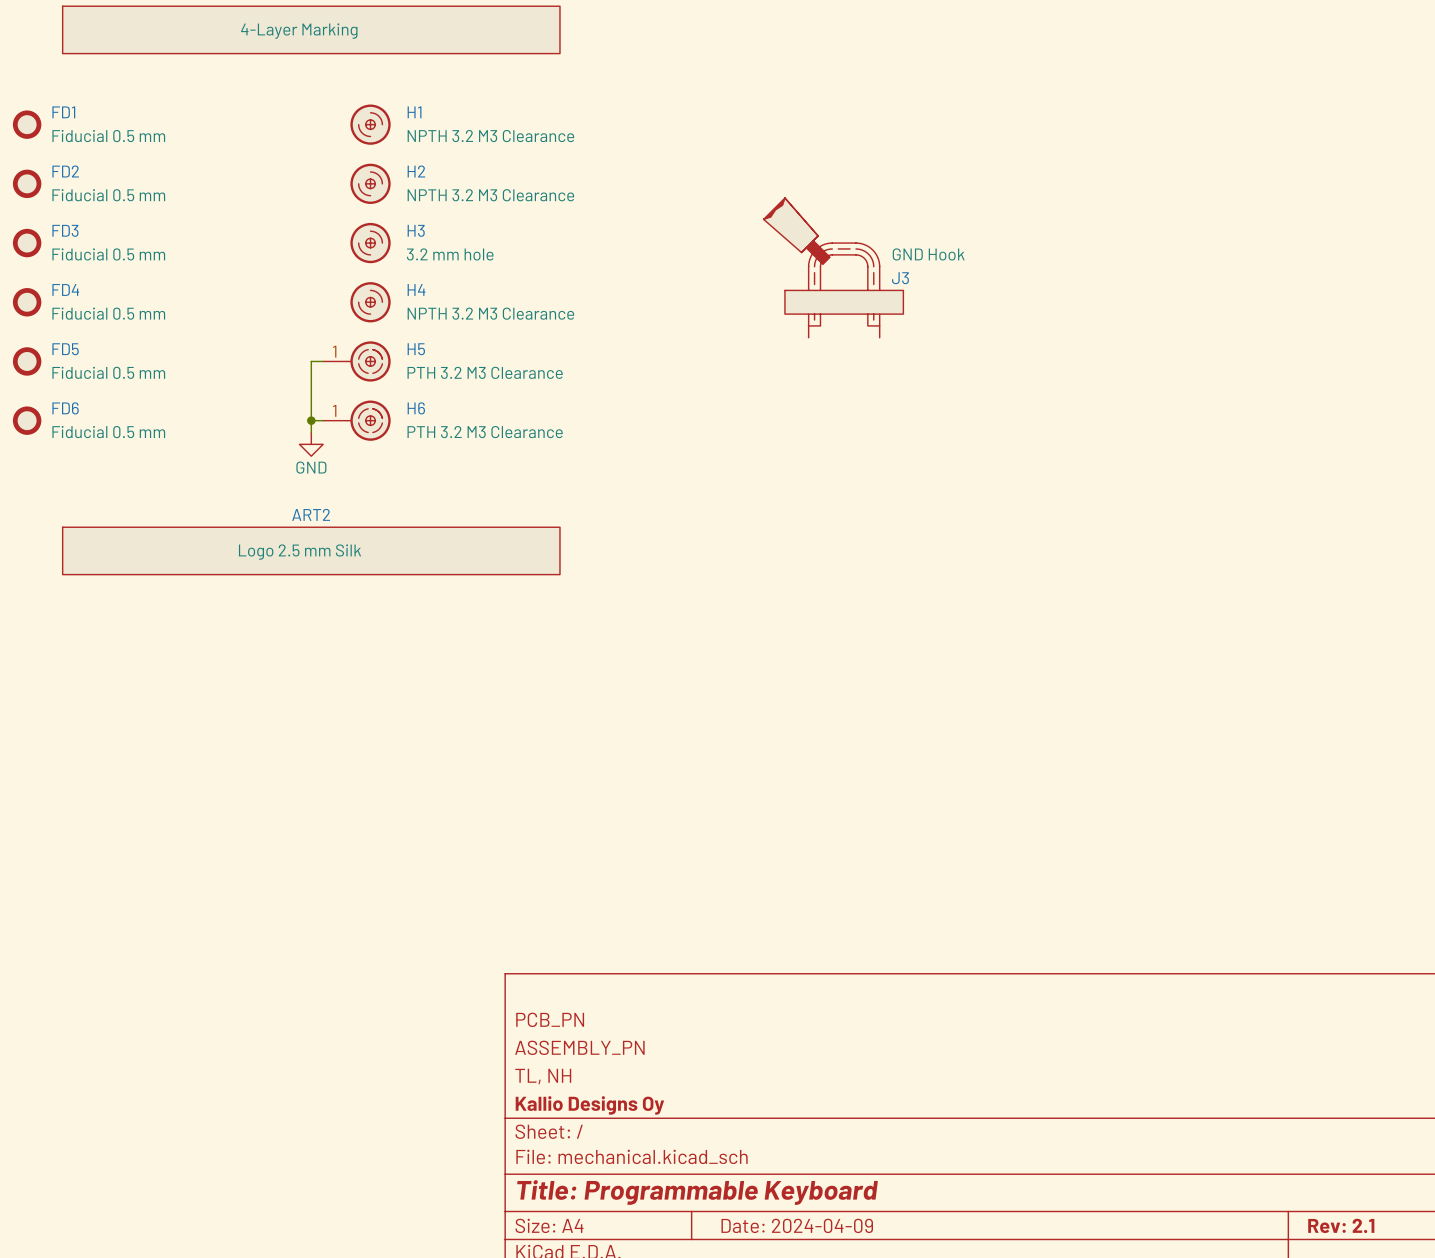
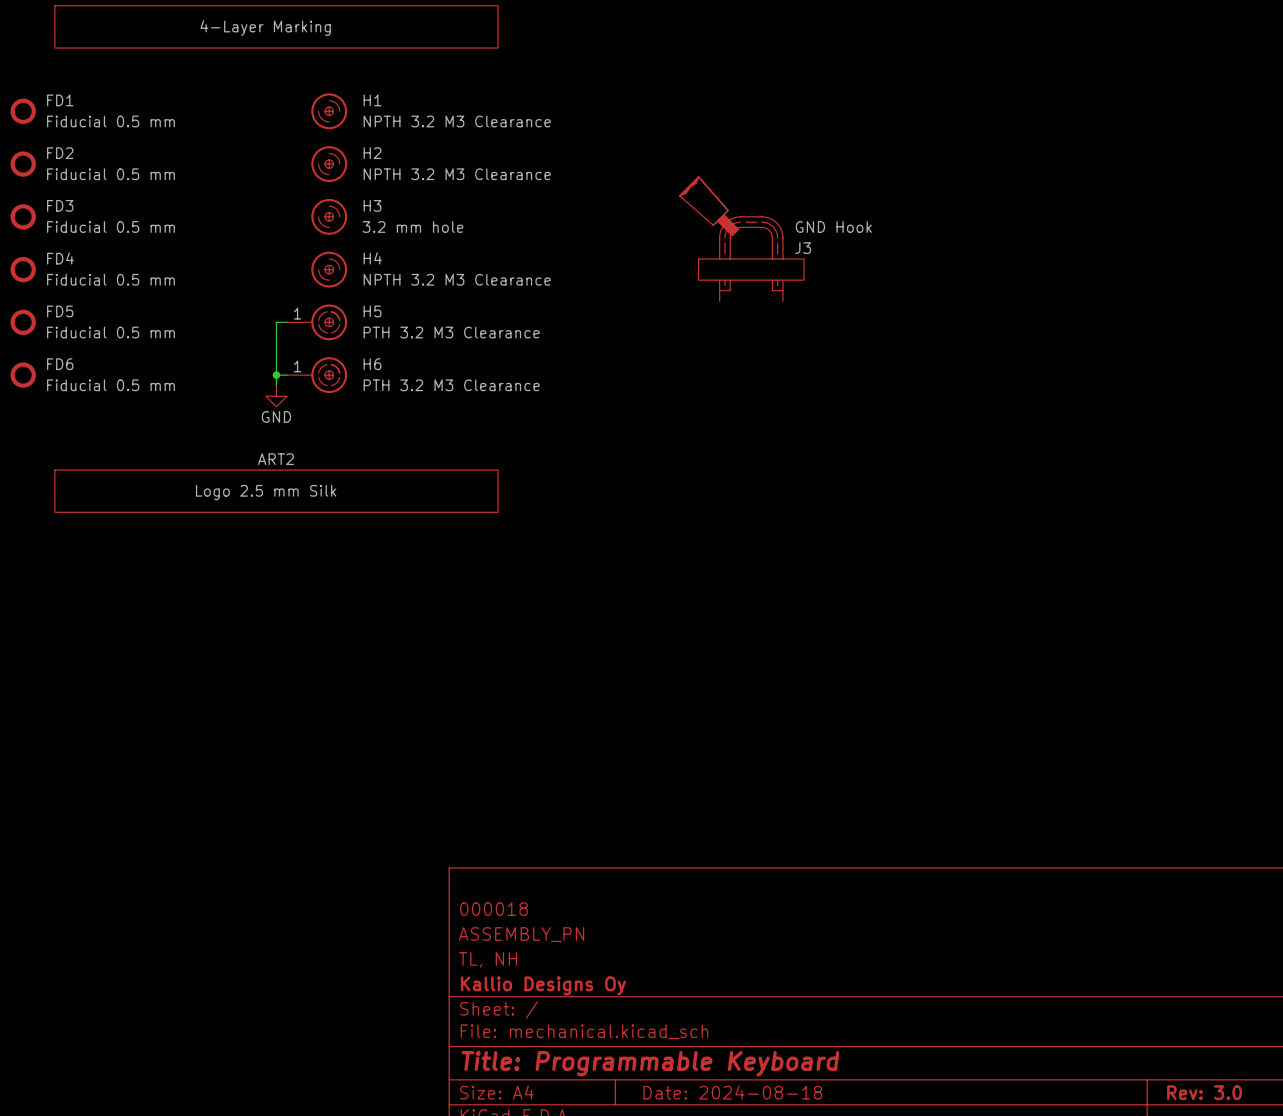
title block: PCB_PN (550, 1019) -> 000018 (493, 909)
title block: Date: 2024-04-09 (797, 1225) -> Date: 2024-08-18 (732, 1092)
title block: Rev: 2.1 (1341, 1225) -> Rev: 3.0 (1204, 1092)

